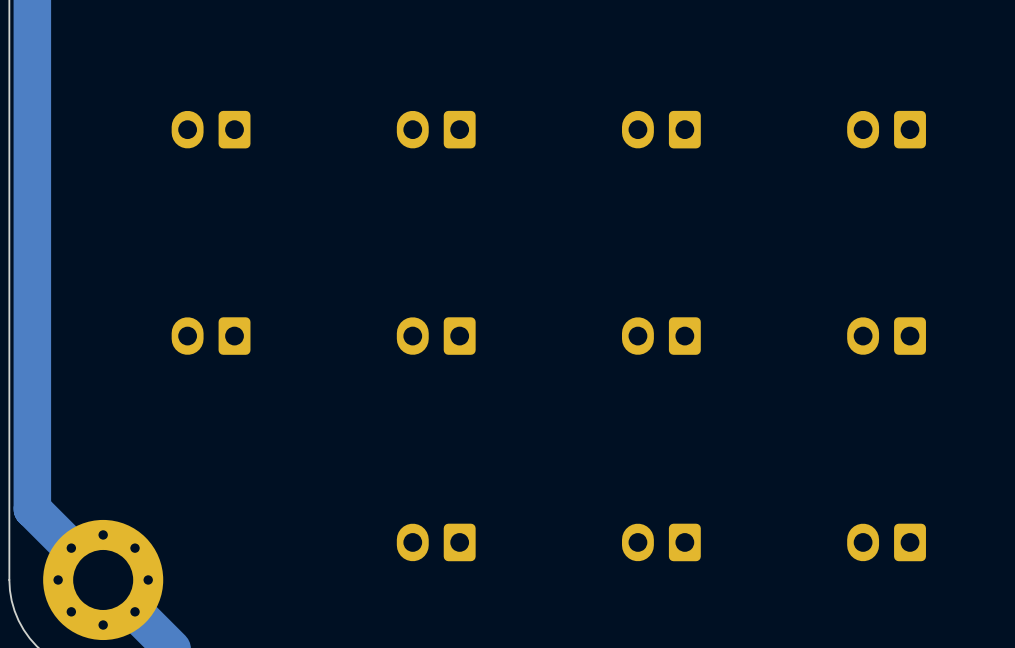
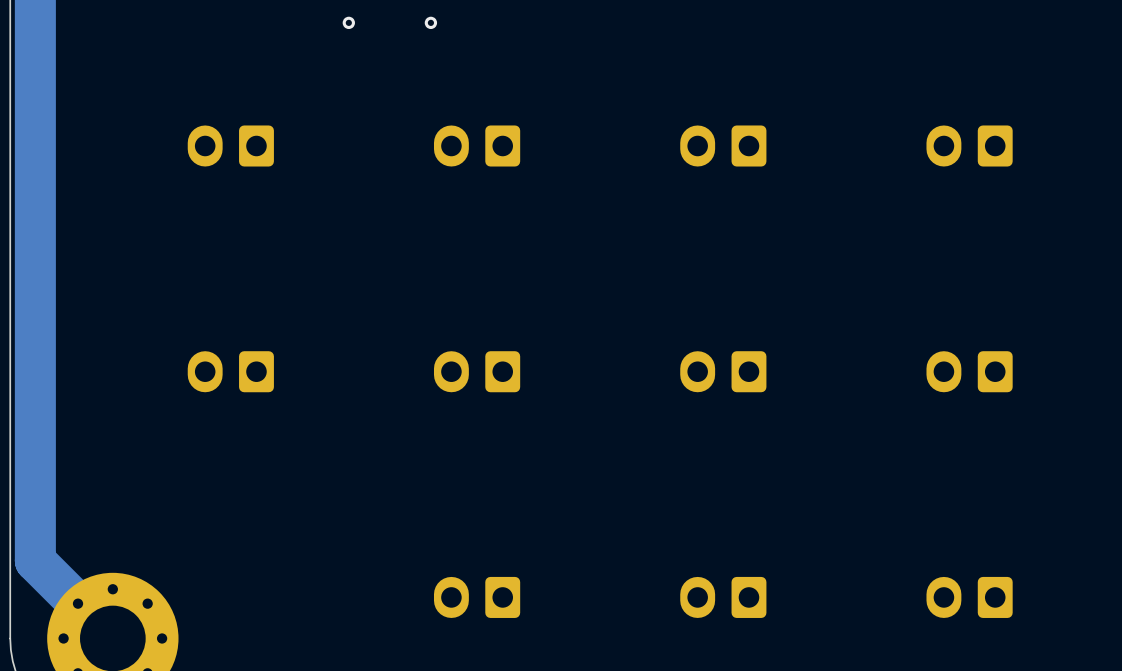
via: none -> (348, 22)
via: none -> (430, 22)

